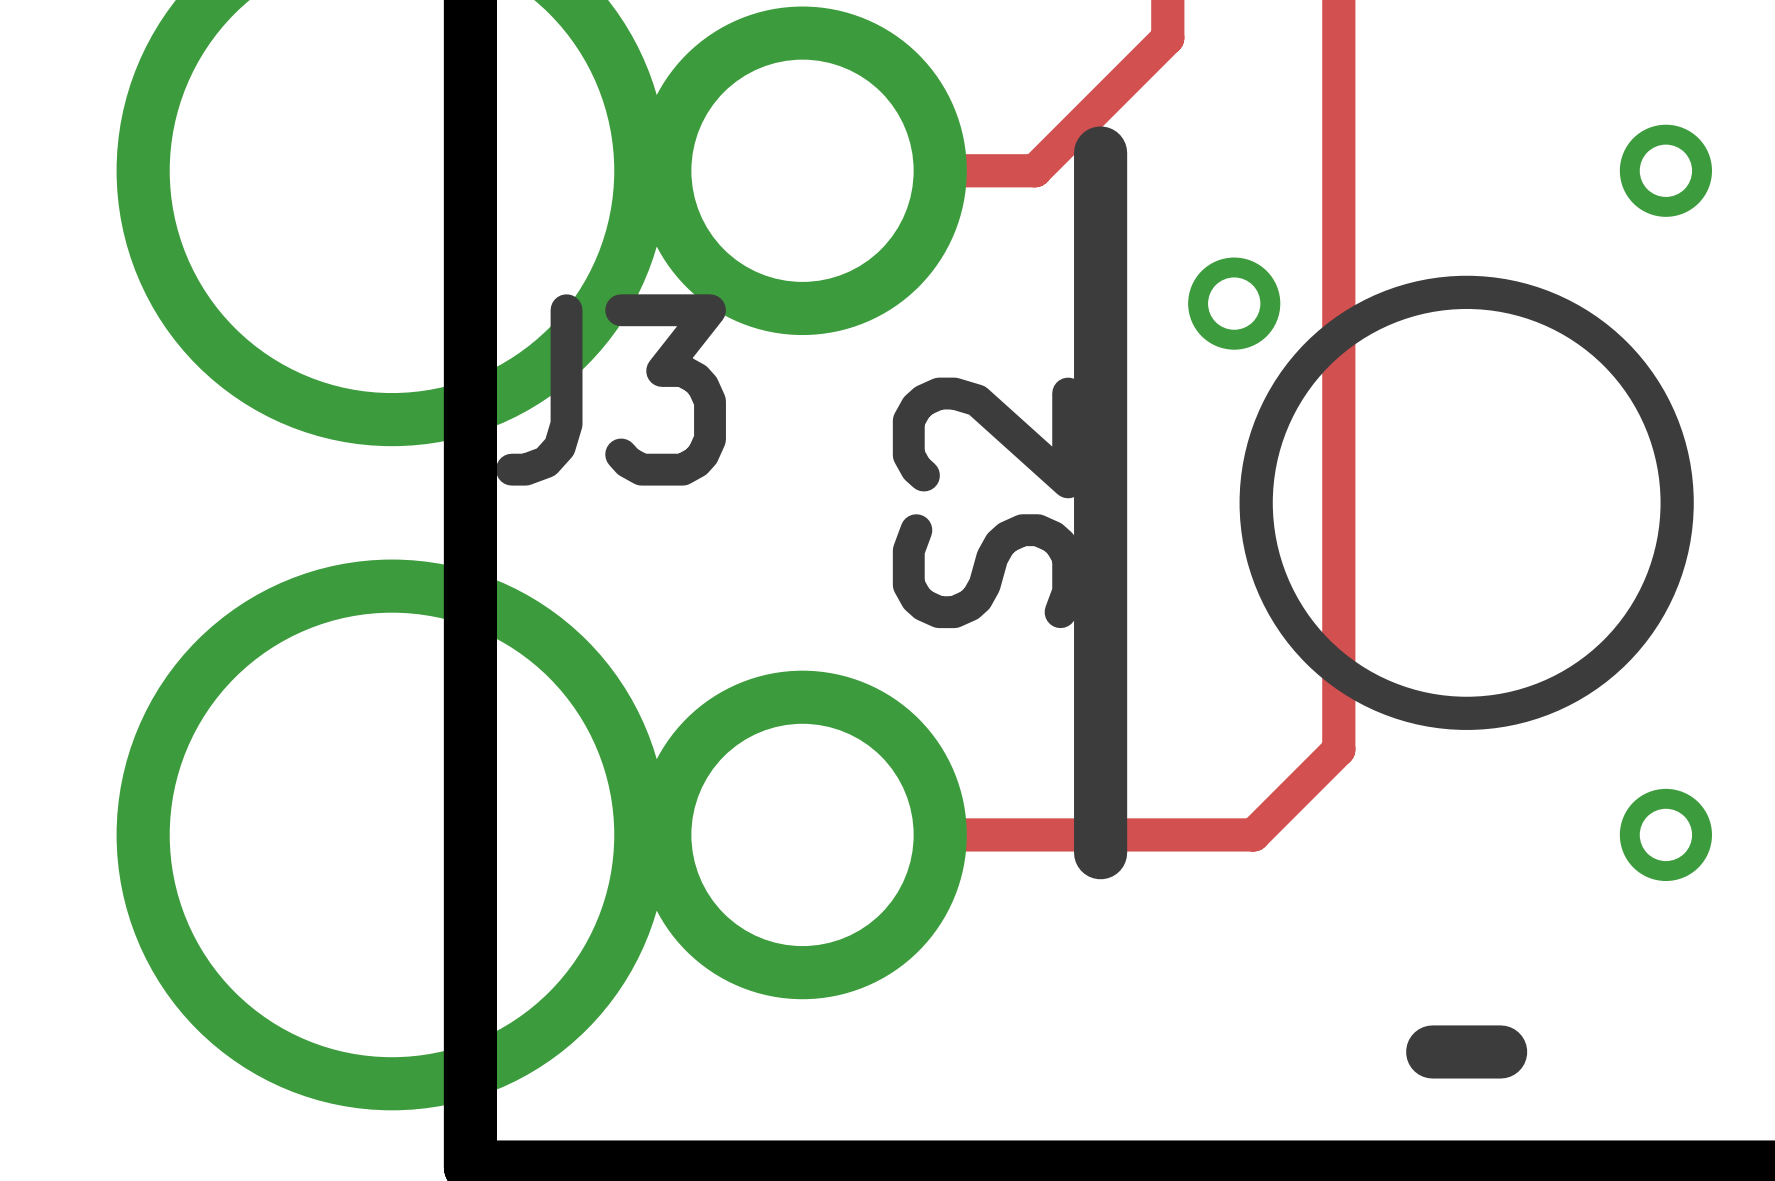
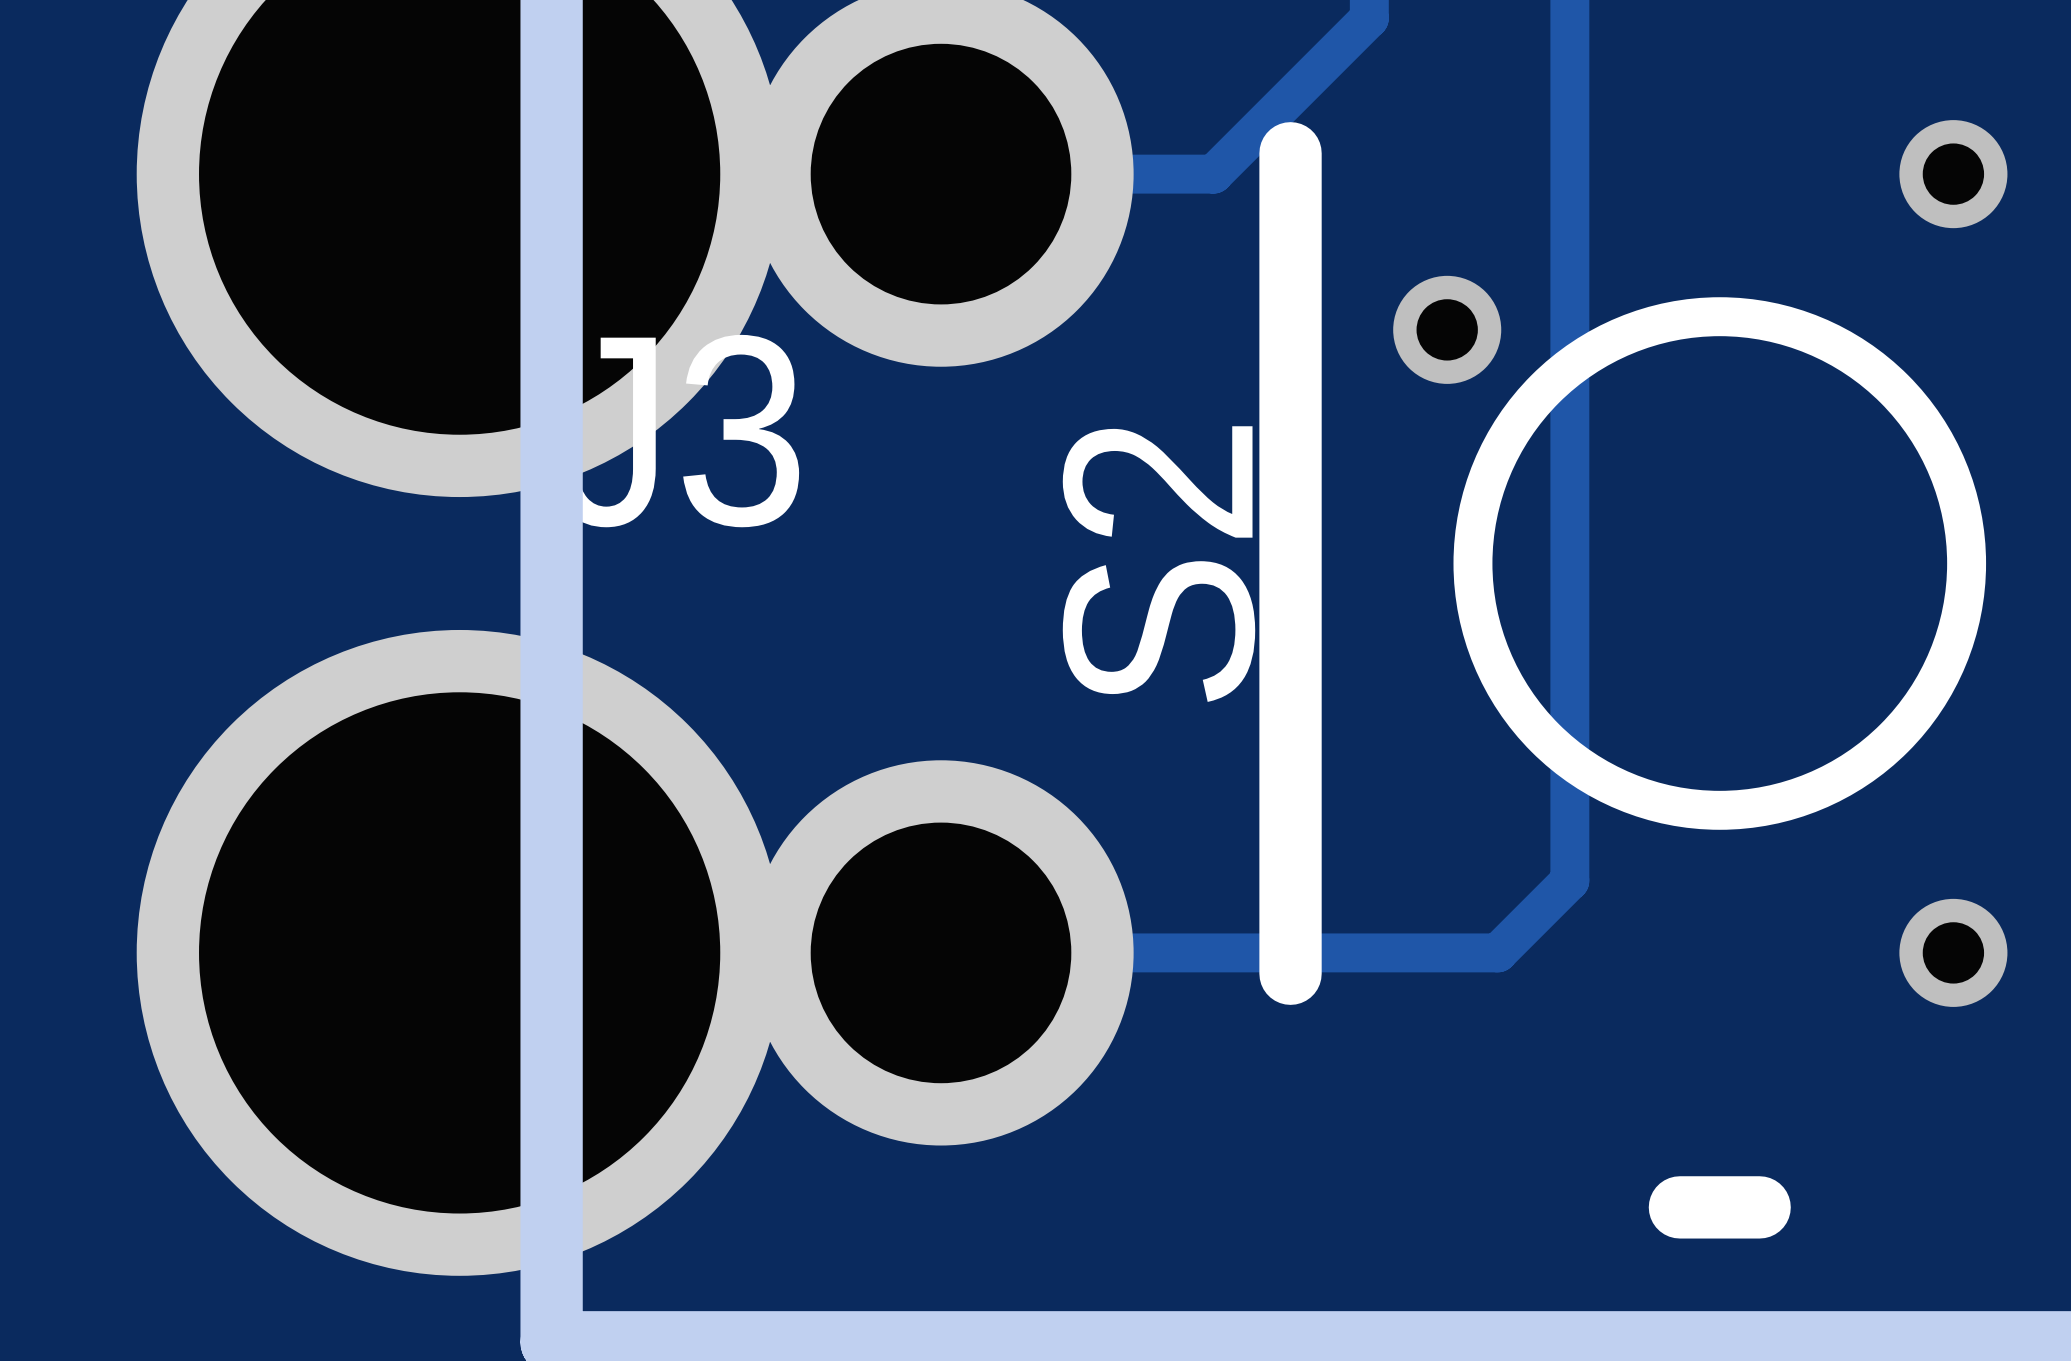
track: (1338, 749) (1253, 834) -> (1569, 852) (1569, 880) (1497, 952) (1469, 952)

